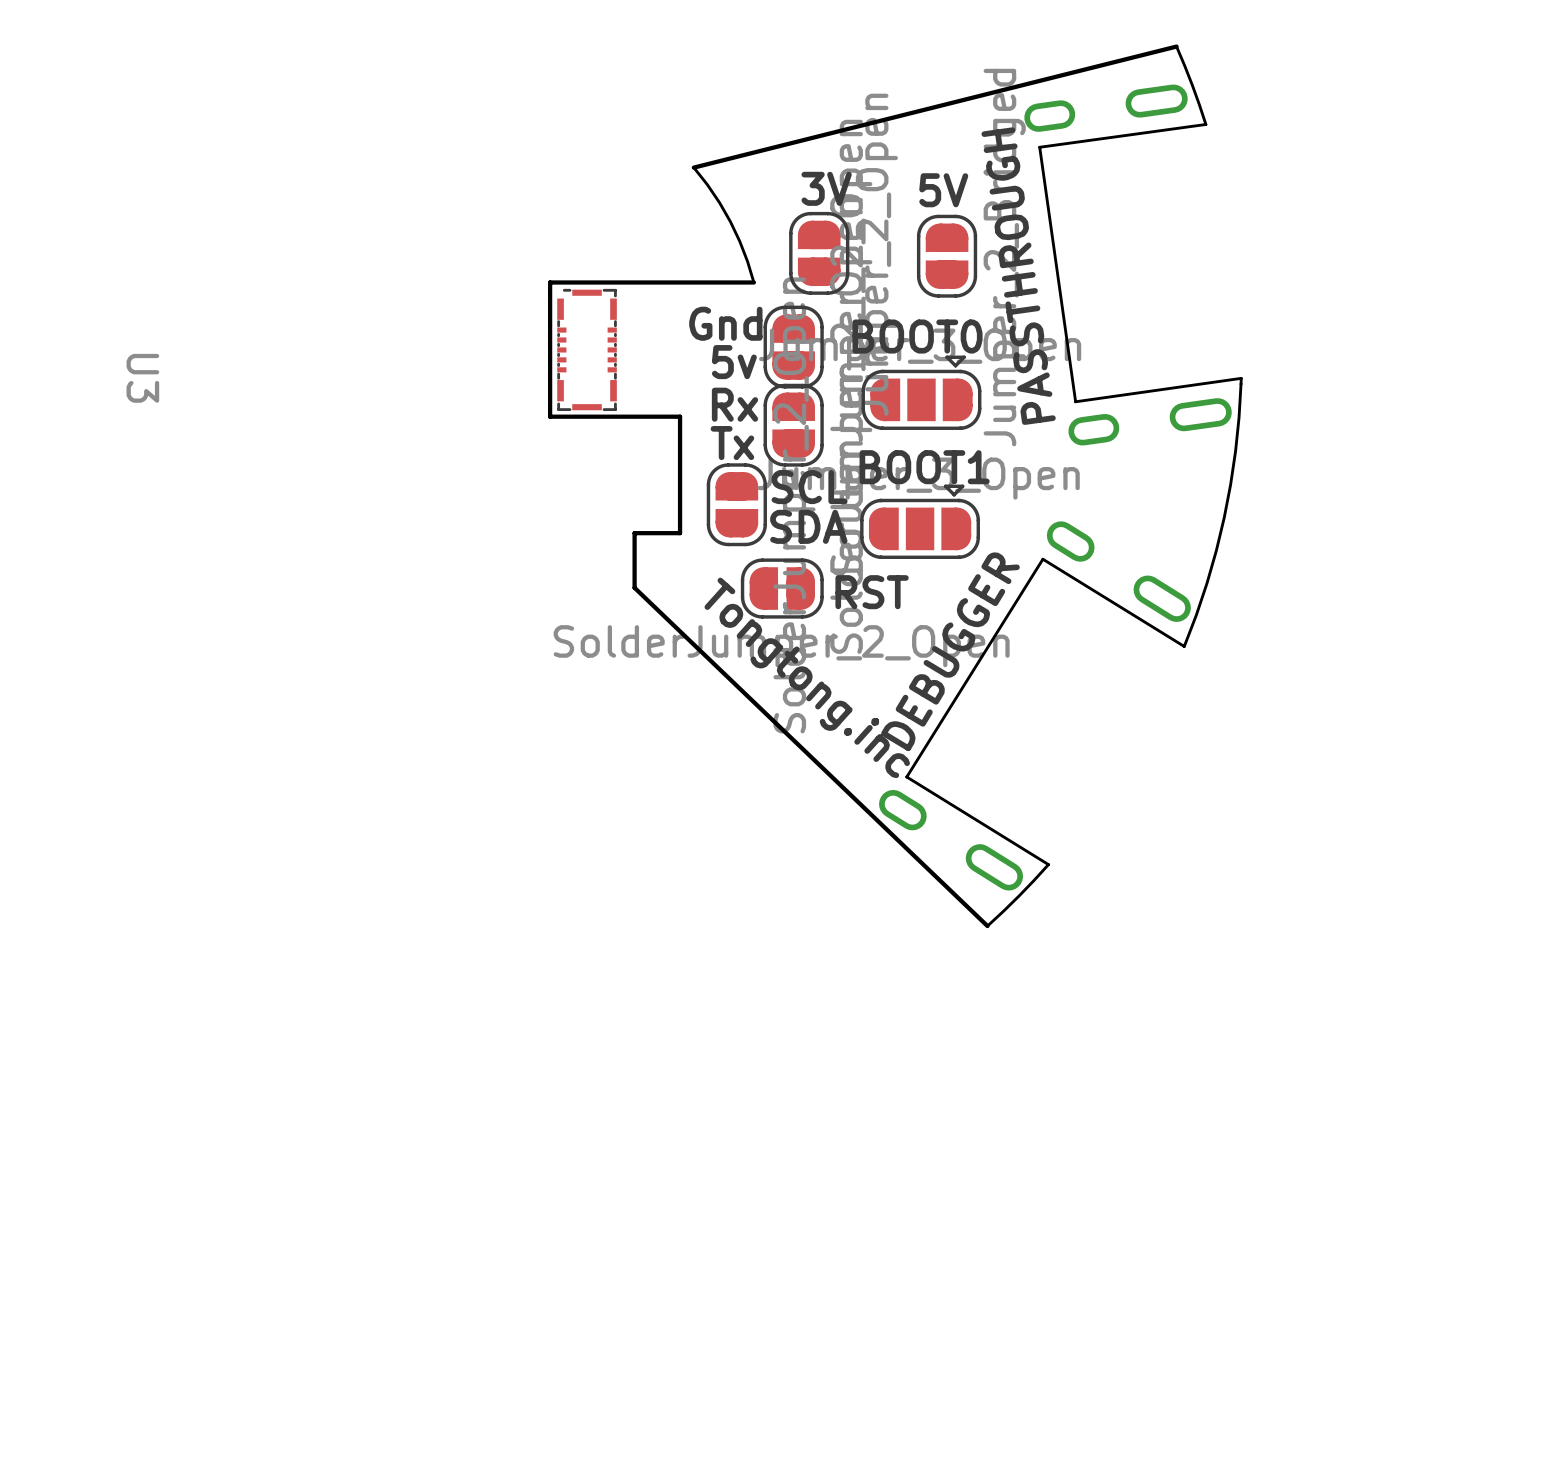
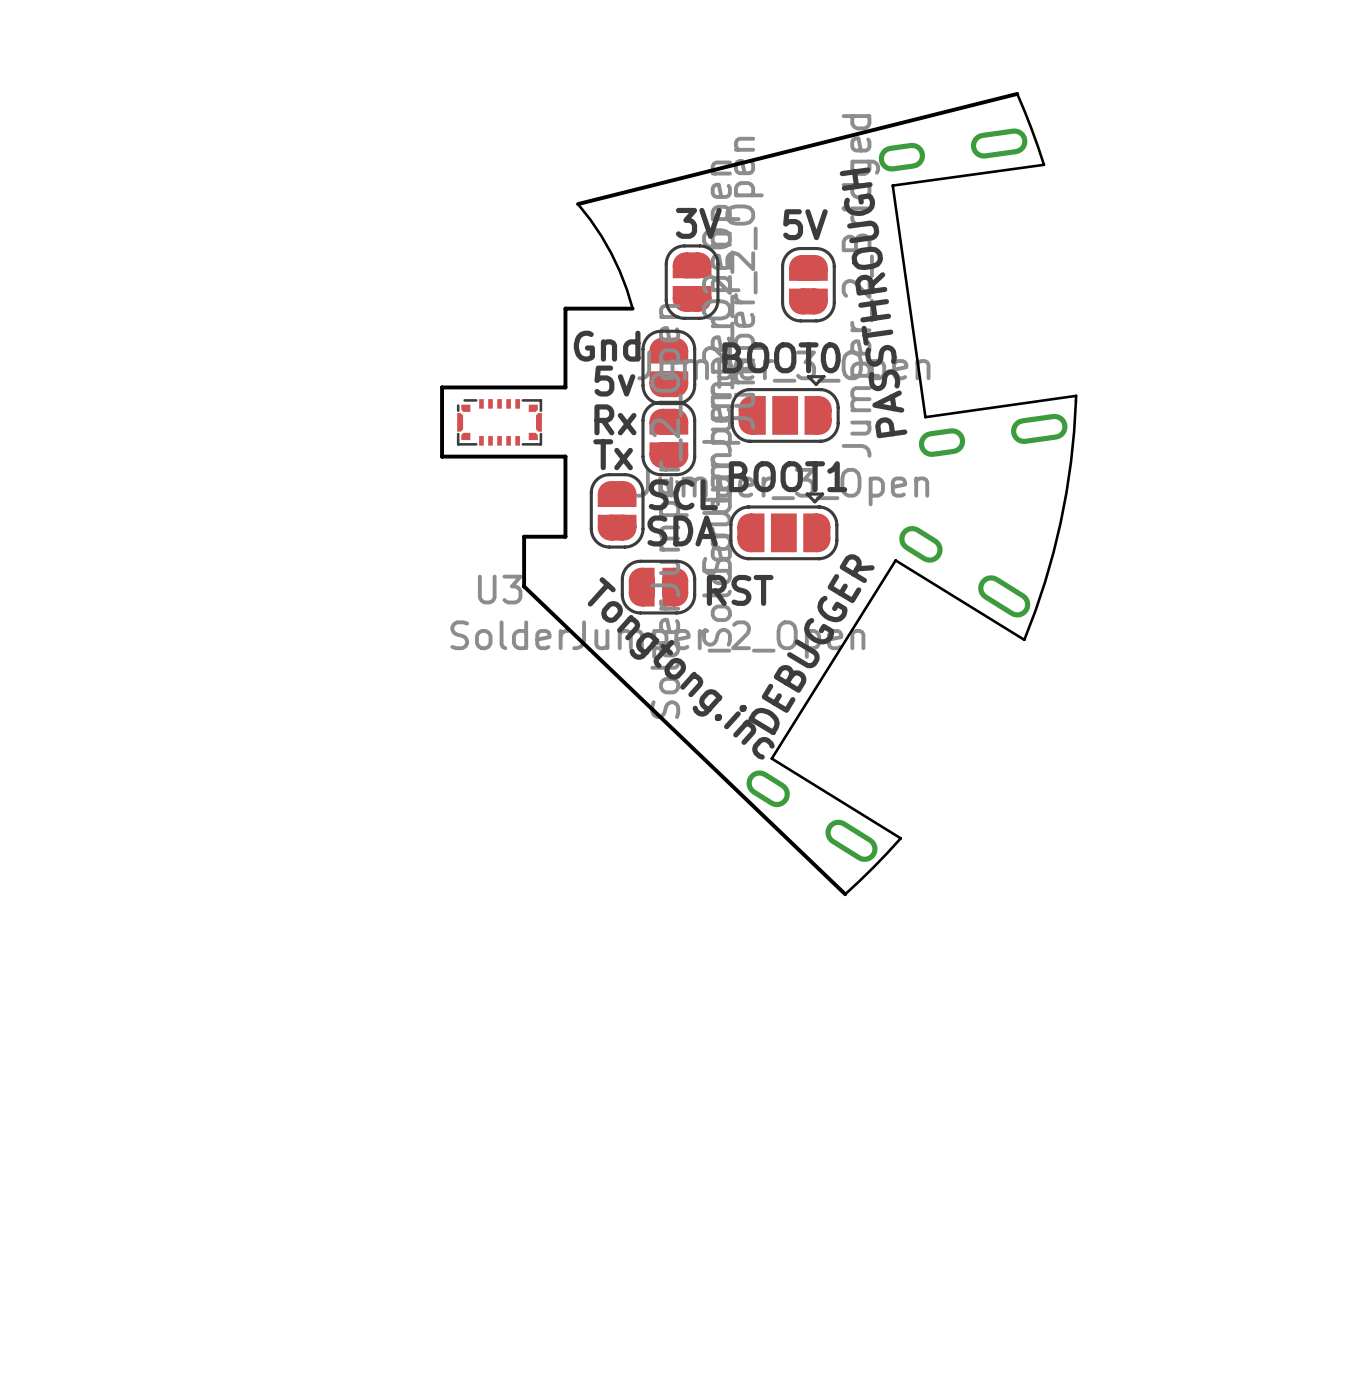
board edge: (680, 282) (550, 282) (550, 416) (680, 416) (680, 445) -> (565, 308) (565, 387) (442, 387) (442, 456) (565, 456)
U3 footprint: [555, 288, 617, 412] -> [456, 399, 543, 446]
U3 name position: U3 (142, 378) -> U3 (500, 589)

